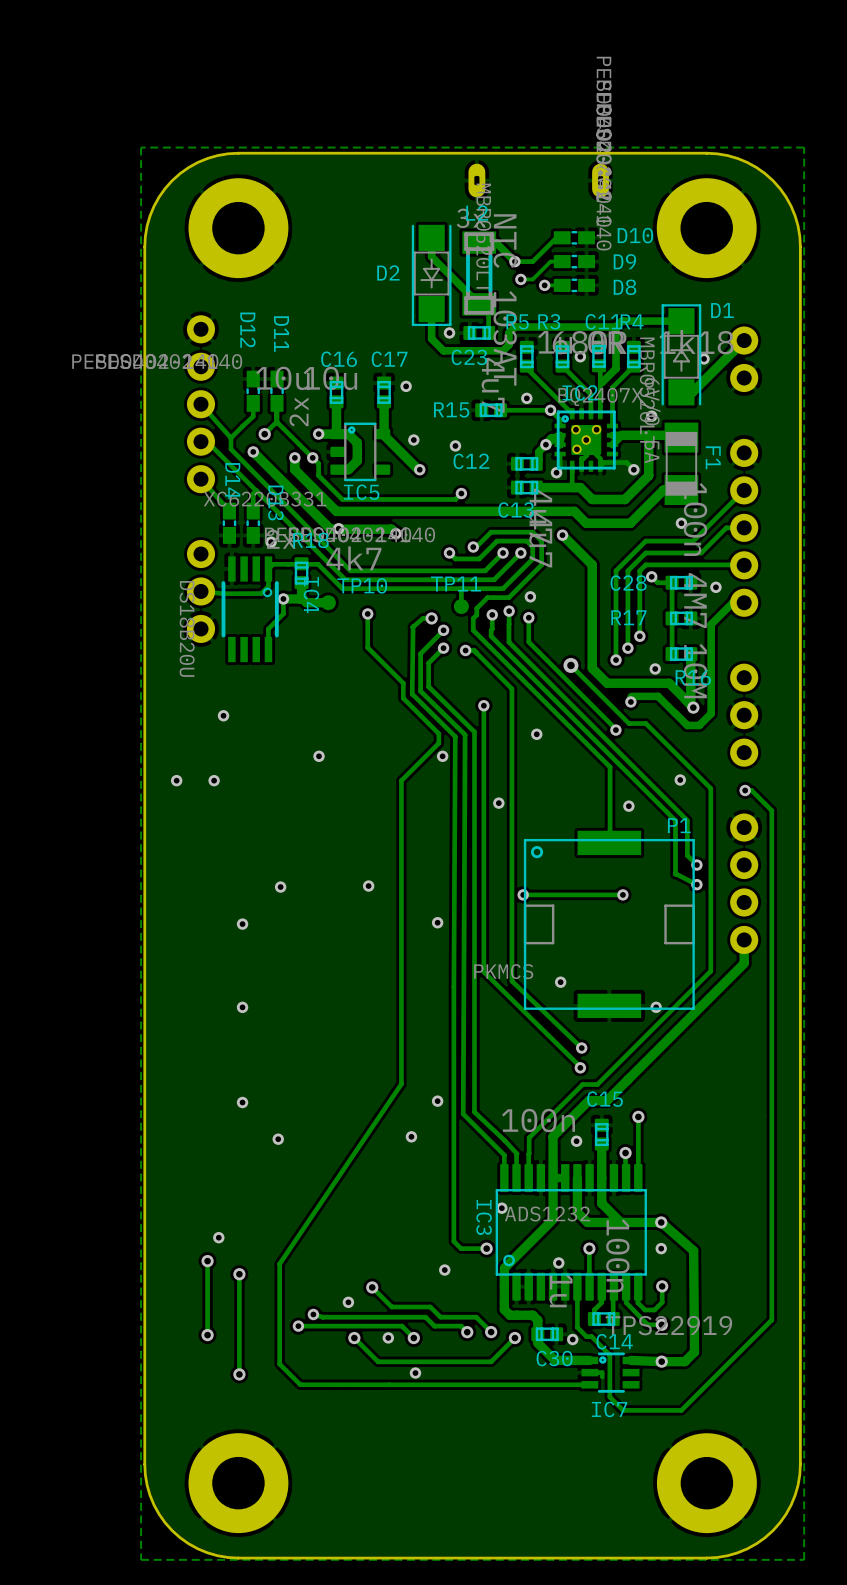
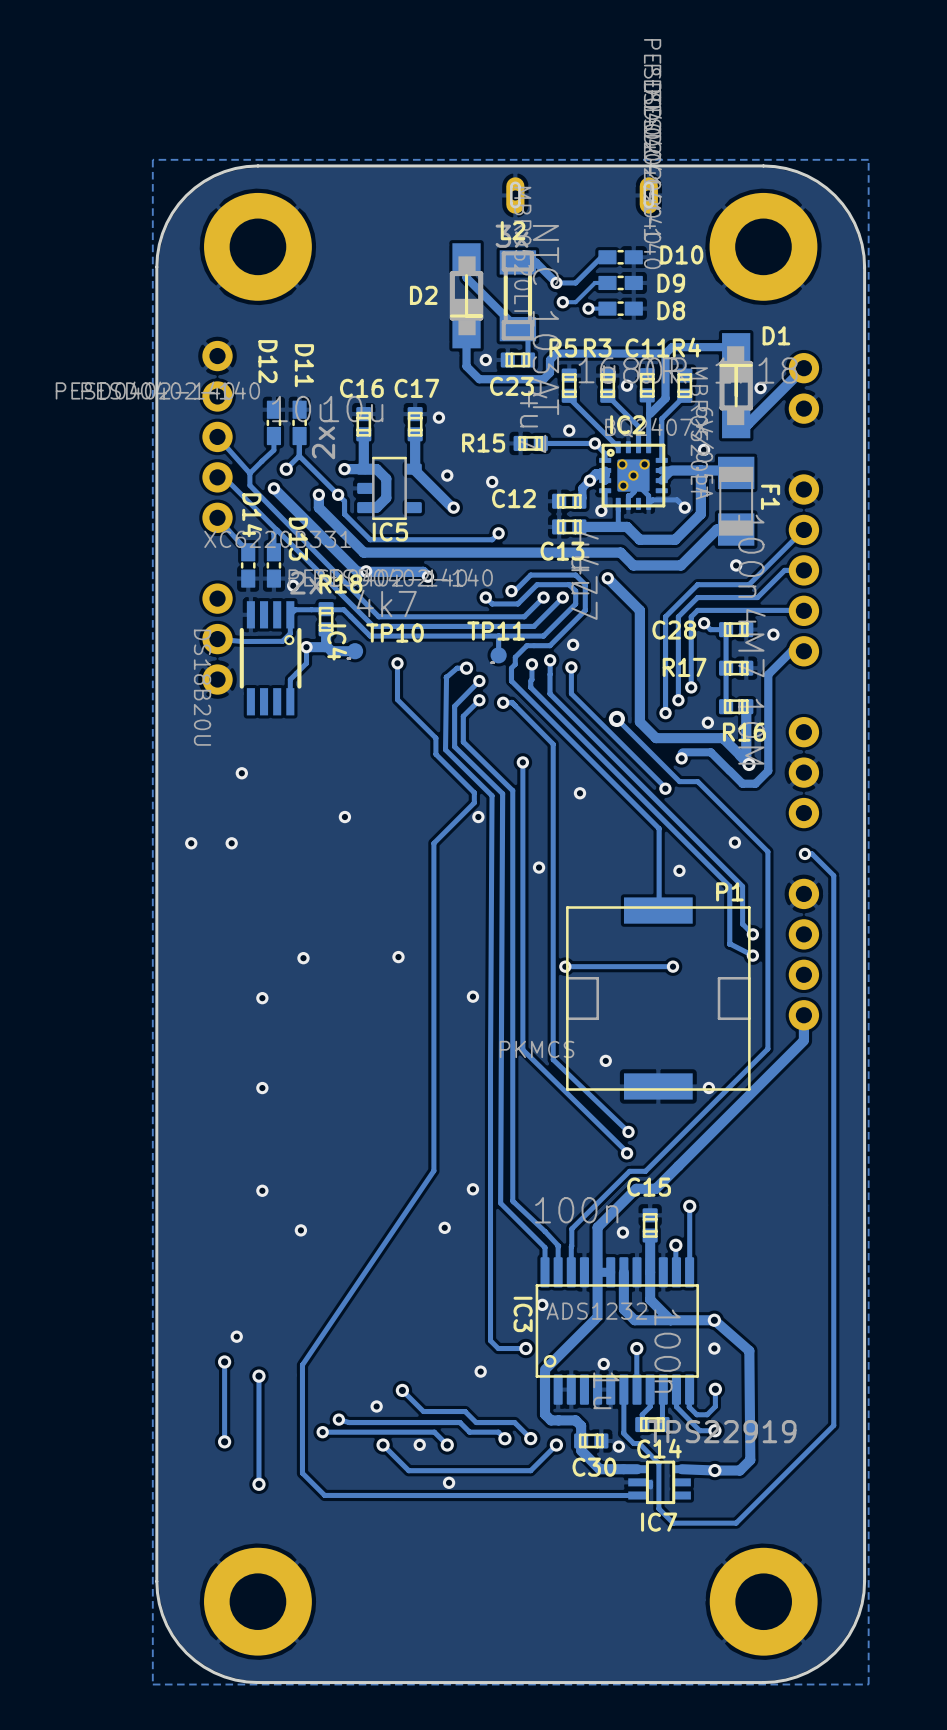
D2 footprint: [411, 224, 452, 326] -> [449, 243, 484, 349]
D1 footprint: [661, 304, 702, 406] -> [719, 333, 753, 439]
IC5 footprint: [330, 422, 391, 482] -> [357, 456, 422, 521]
P1 footprint: [523, 830, 695, 1019] -> [566, 897, 751, 1100]
IC7 footprint: [581, 1352, 640, 1393] -> [628, 1460, 691, 1505]

